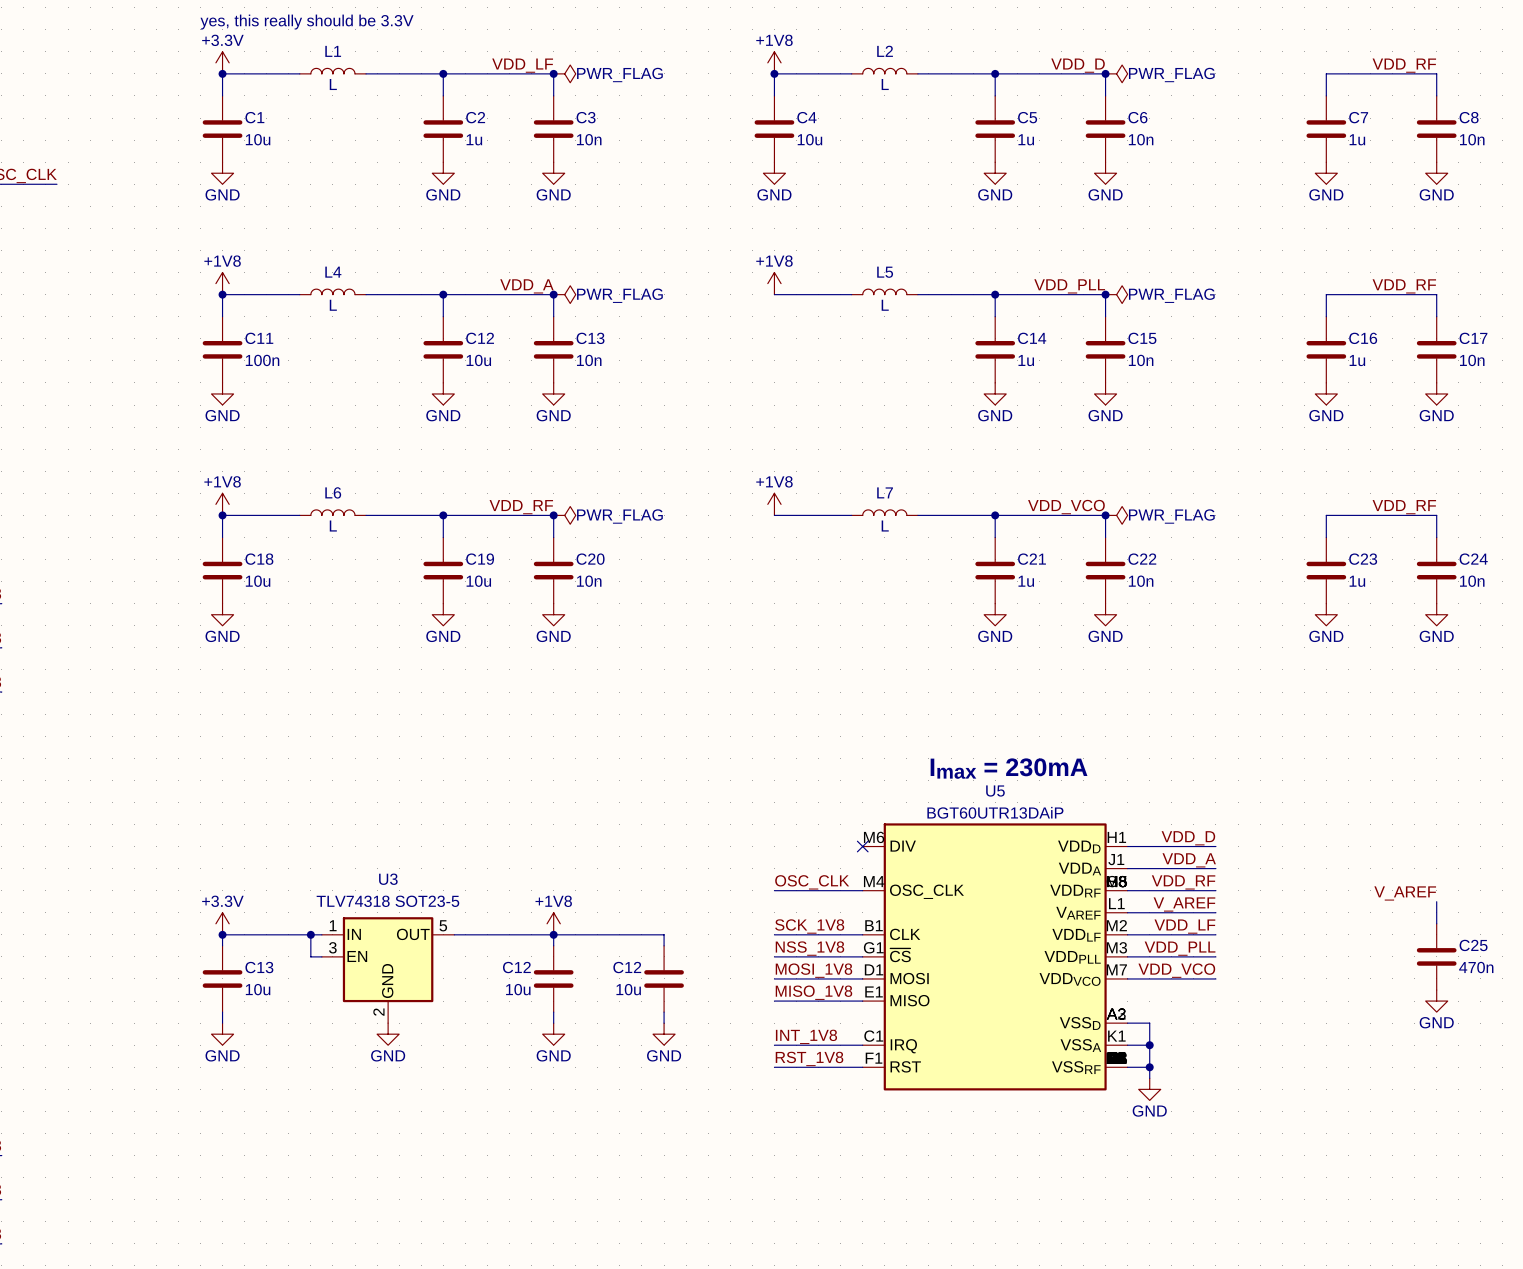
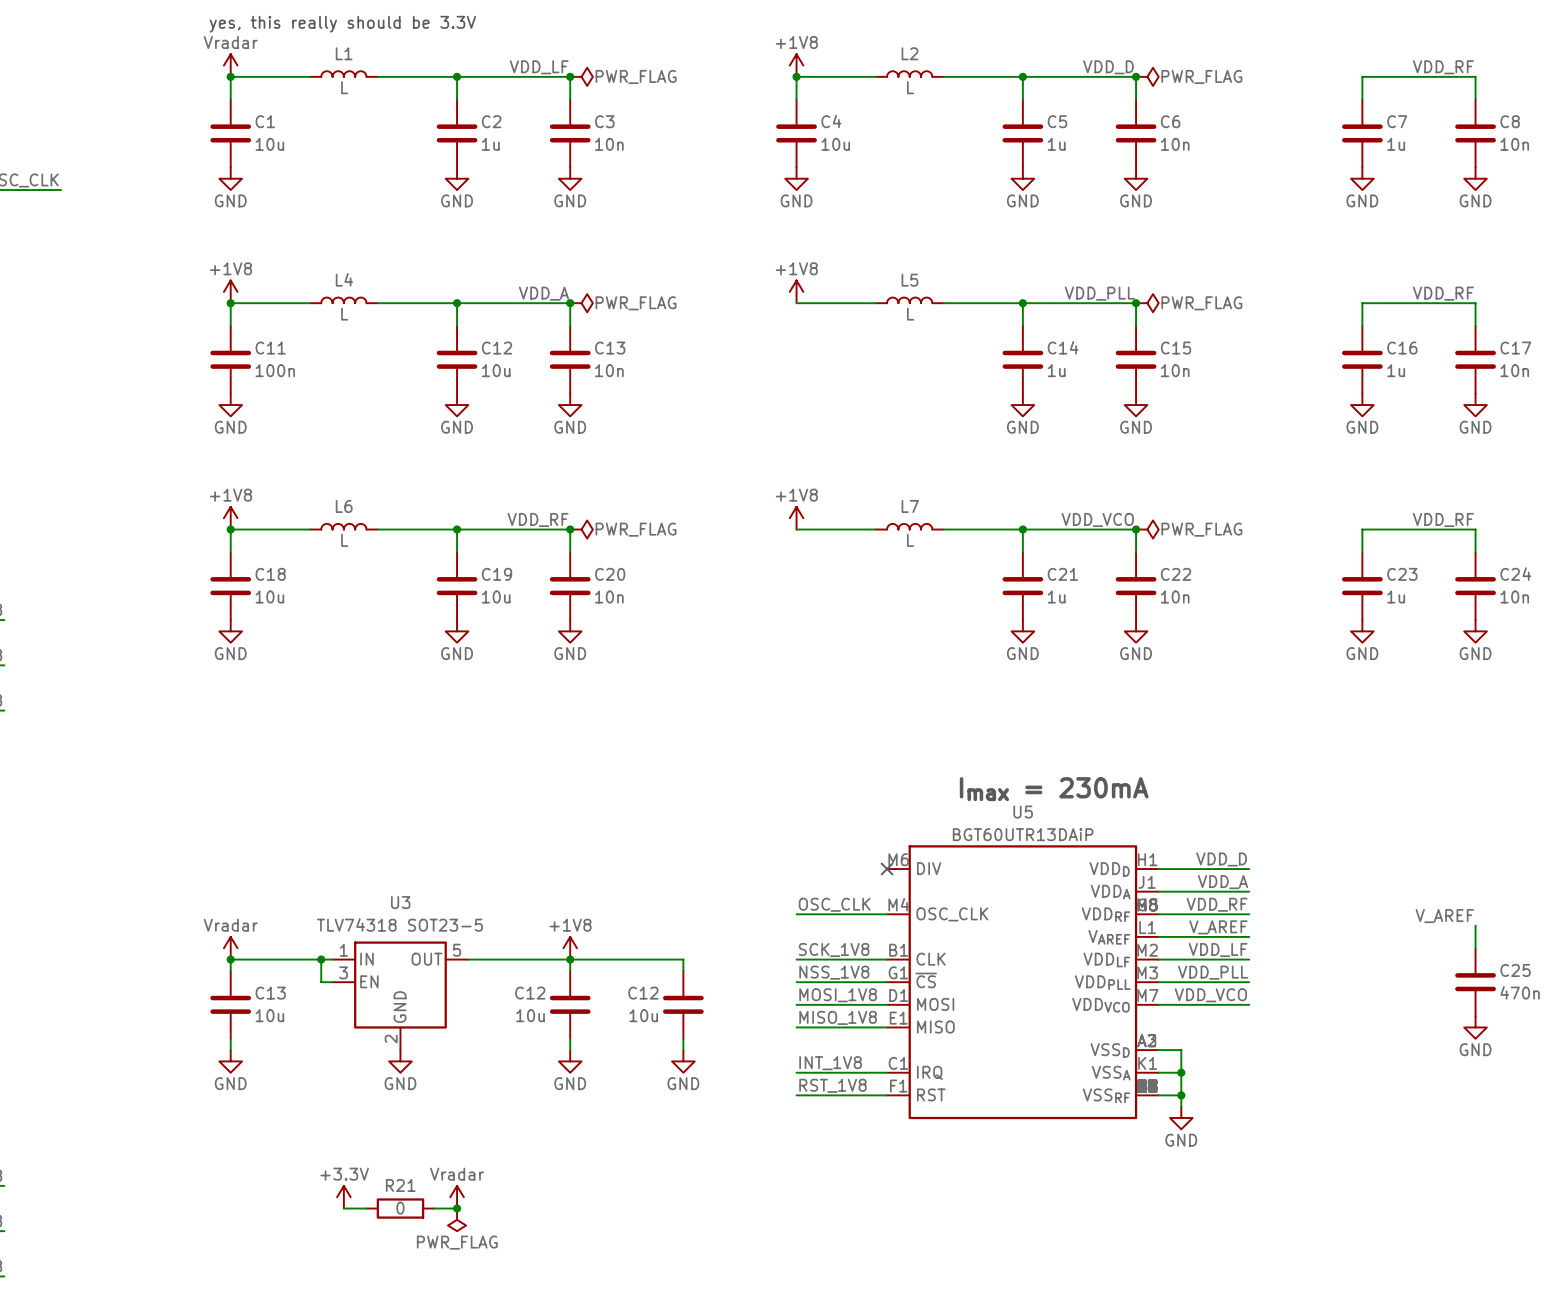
power symbol: +3.3V (222, 62) -> Vradar (230, 65)
power symbol: +3.3V (222, 923) -> Vradar (230, 948)
power symbol: none -> +3.3V (343, 1197)
power symbol: none -> Vradar (457, 1197)
wire: none -> (343, 1208) (366, 1208)
R21: none -> 0 (400, 1208)
wire: none -> (434, 1208) (457, 1208)
junction: none -> (457, 1208)
power symbol: none -> PWR_FLAG (457, 1219)

